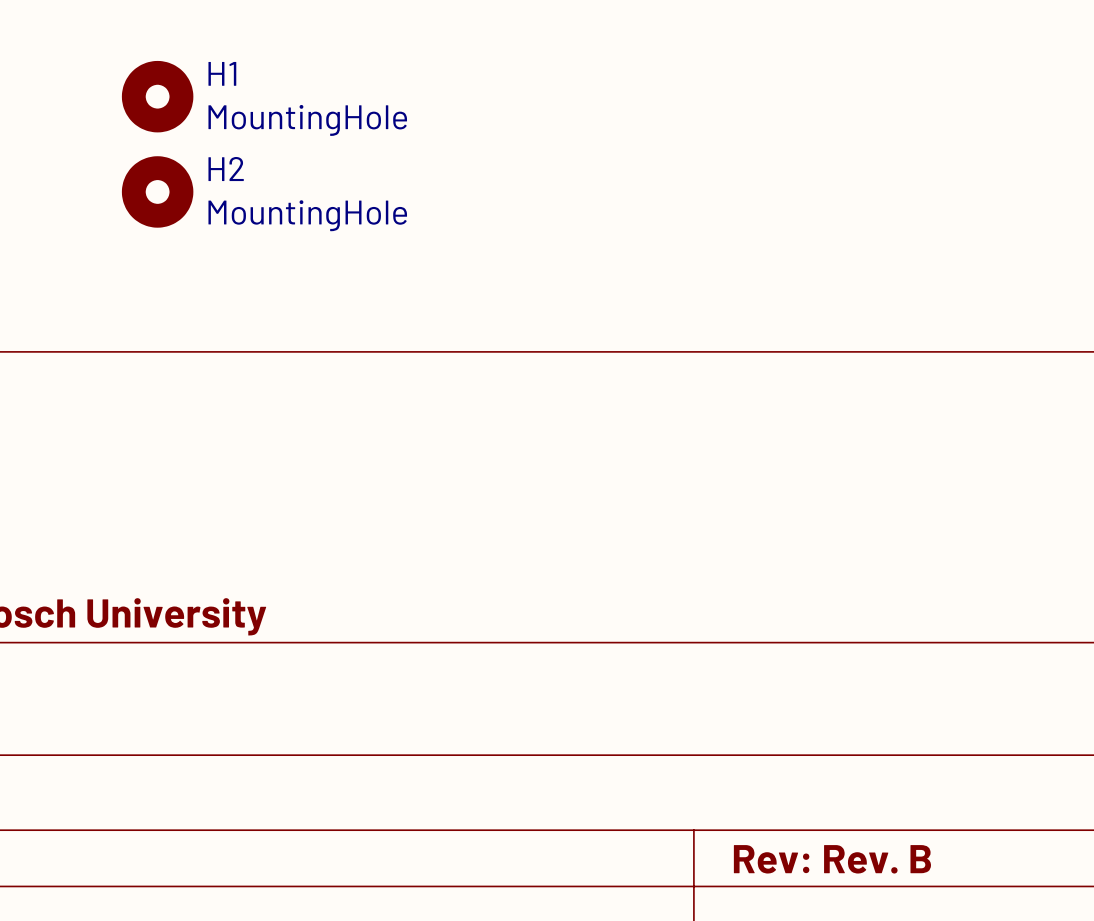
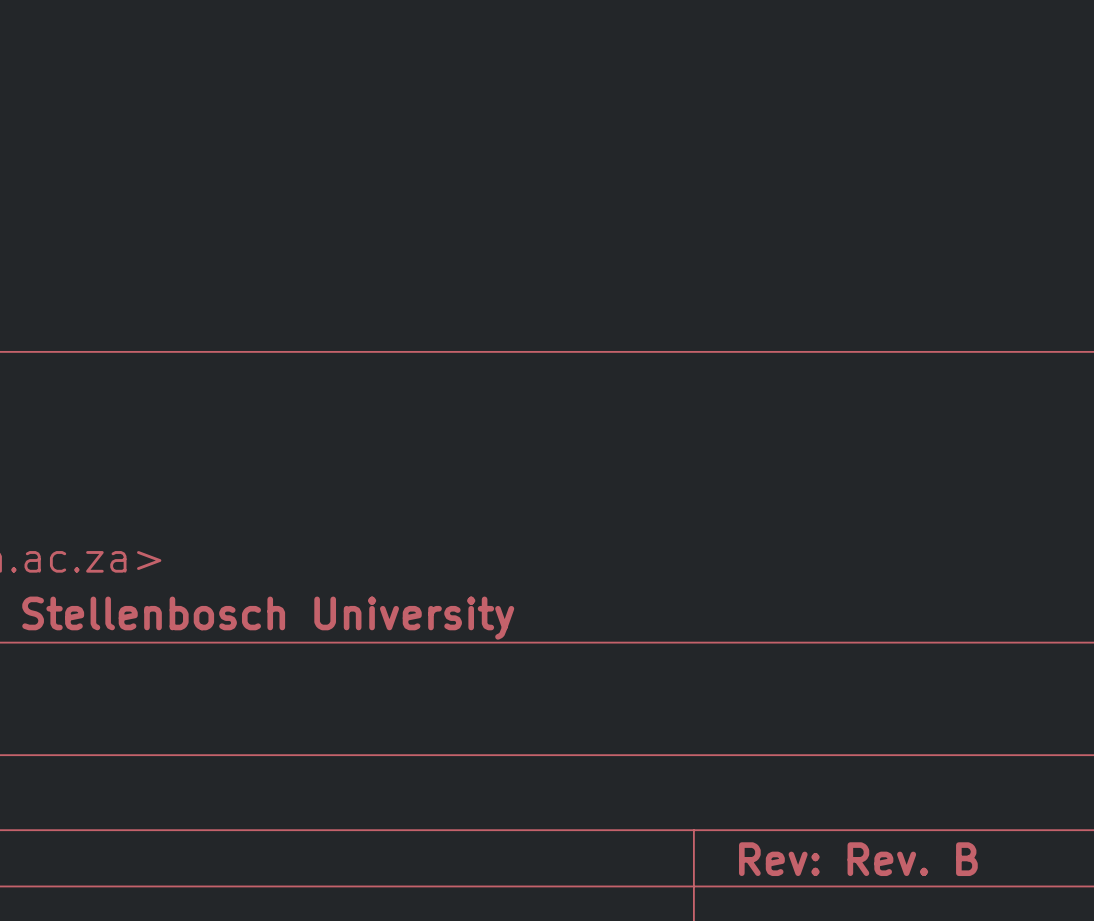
H1: MountingHole (157, 96) -> none
H2: MountingHole (157, 191) -> none

